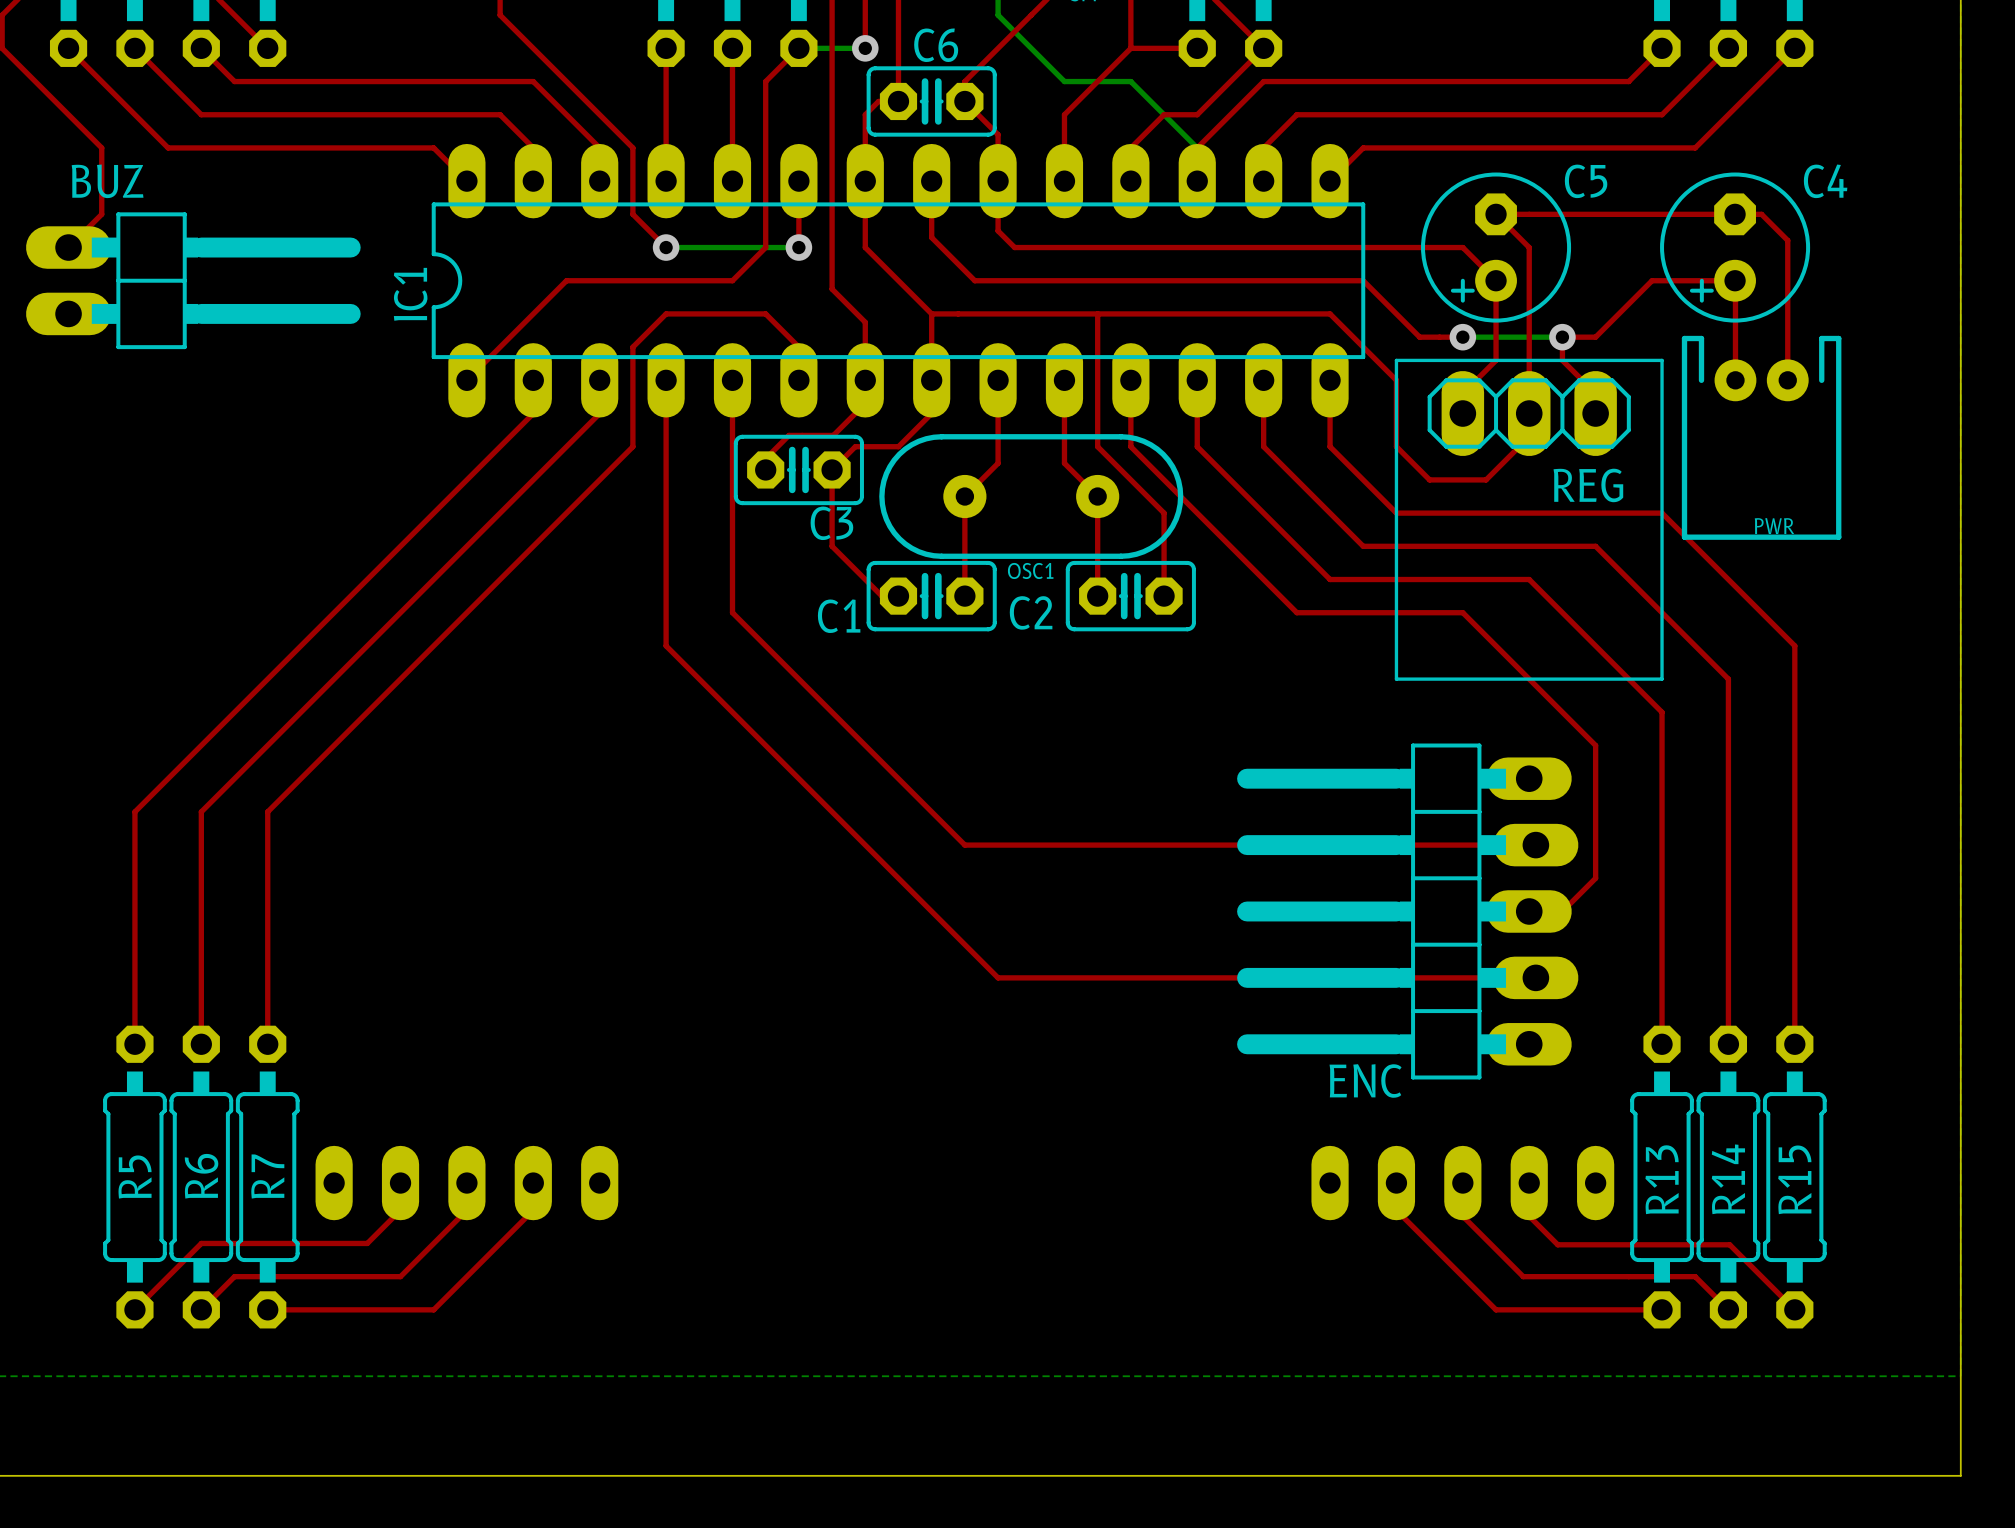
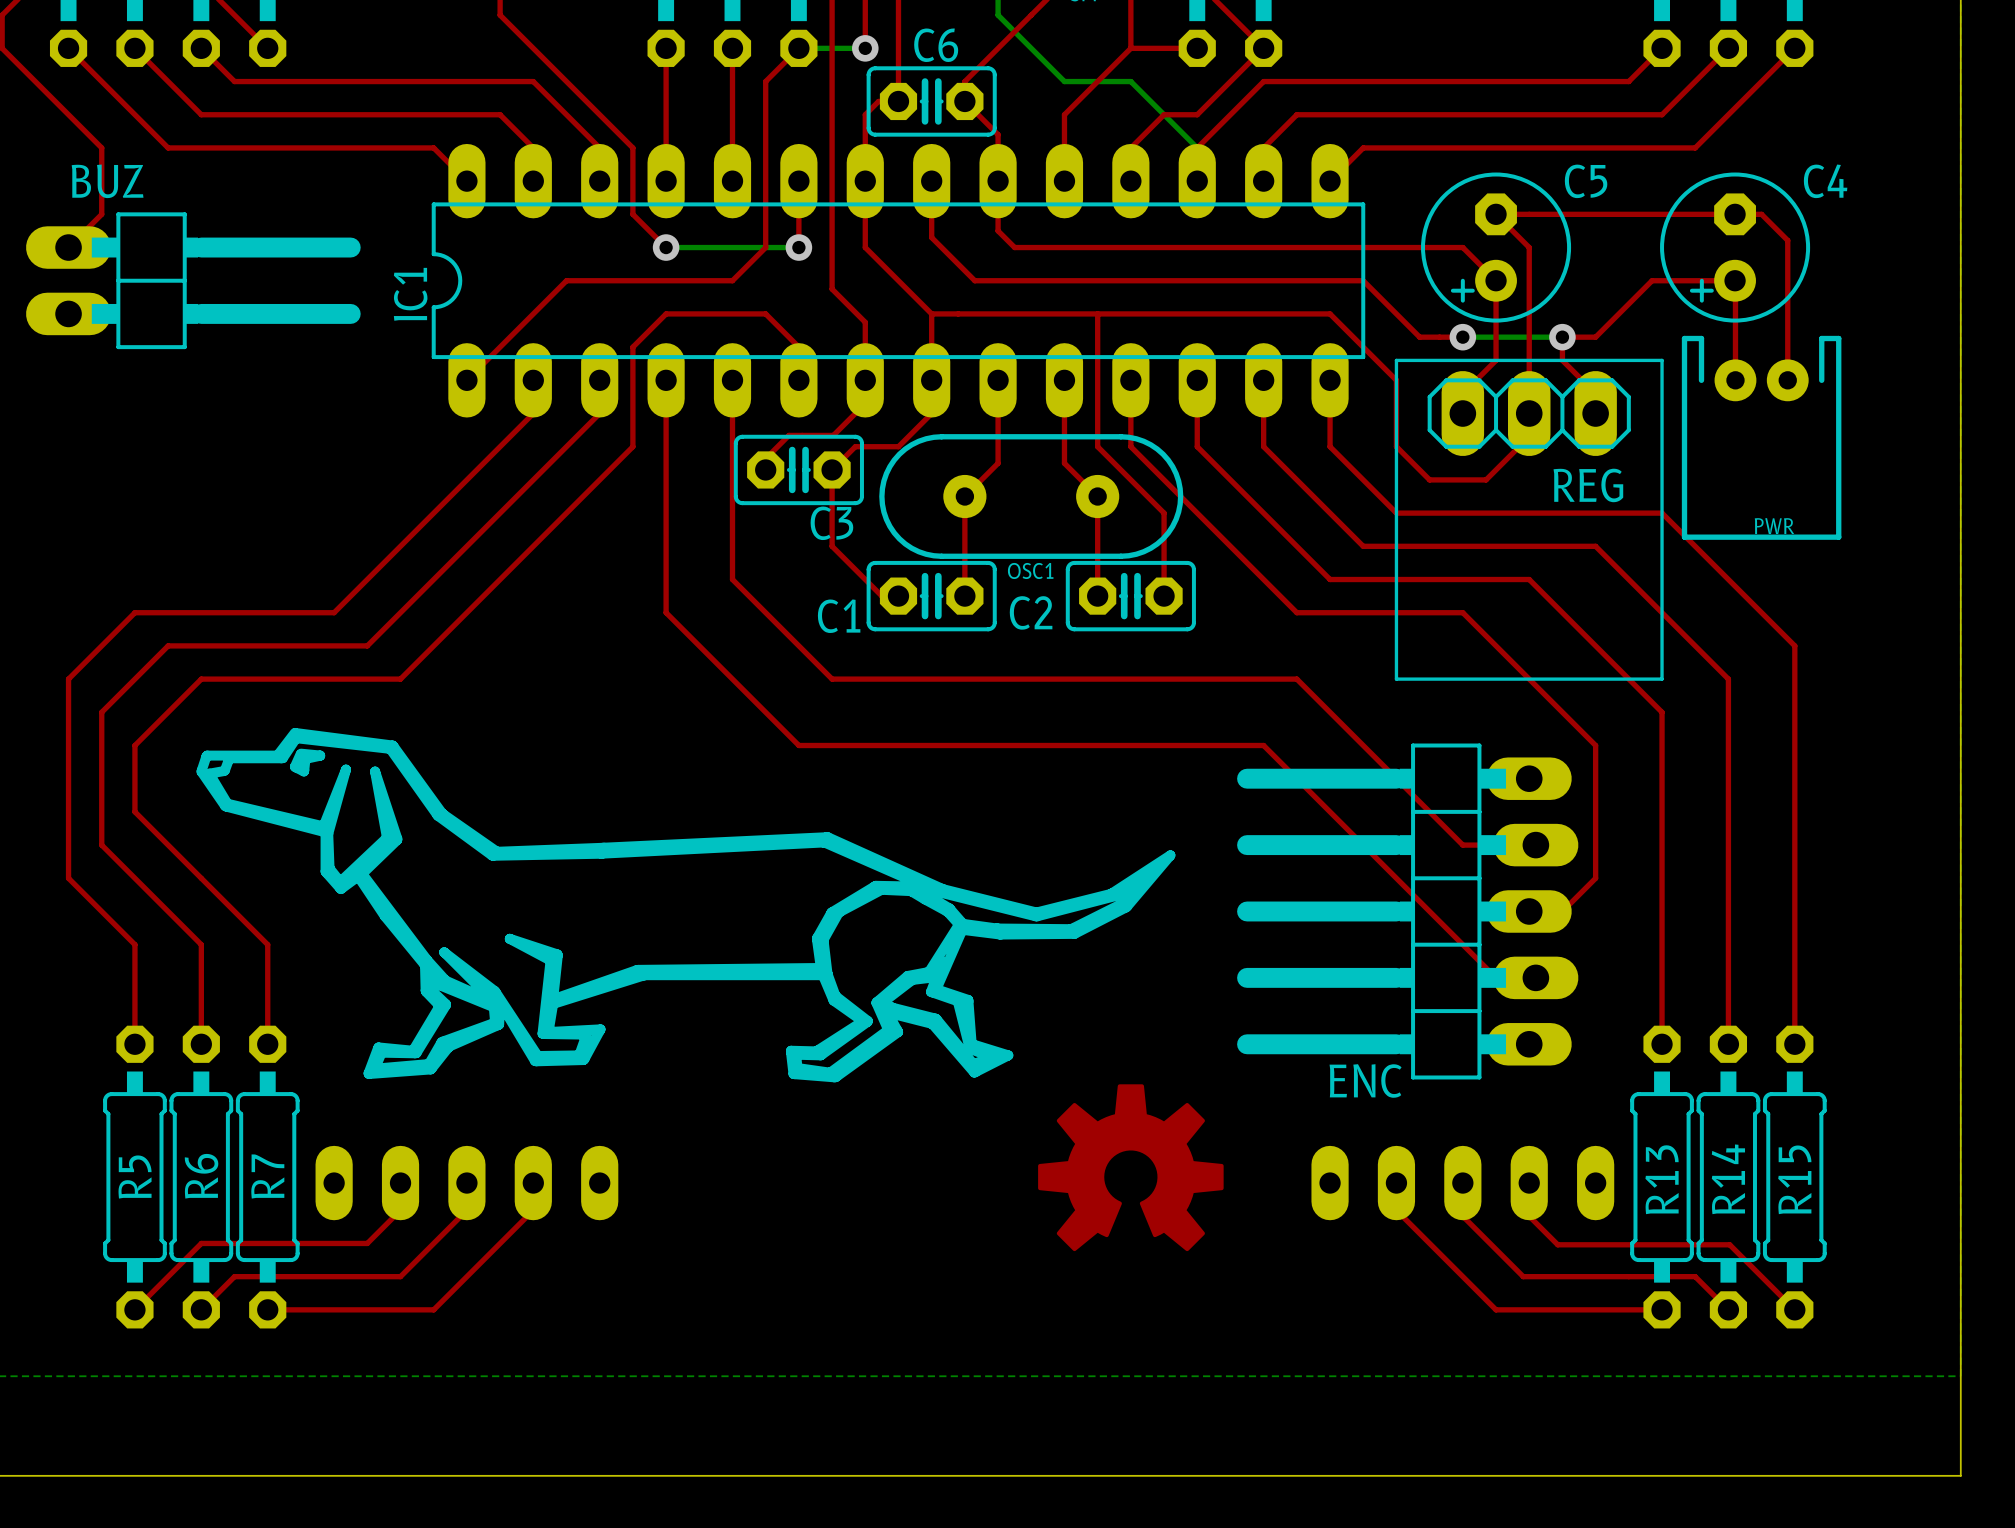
top track: (732, 579) (732, 612) (964, 845) (1462, 845) -> (732, 579) (832, 679) (1296, 679) (1462, 845)
top track: (334, 612) (134, 811) (134, 944) -> (334, 612) (134, 612) (68, 679) (68, 878) (134, 944)
top track: (666, 612) (666, 645) (998, 977) (1496, 977) -> (666, 612) (798, 745) (1263, 745) (1496, 977)
top track: (367, 645) (201, 811) (201, 944) -> (367, 645) (168, 645) (101, 712) (101, 845) (201, 944)
top track: (400, 679) (267, 811) (267, 944) -> (400, 679) (201, 679) (134, 745) (134, 811) (267, 944)
drawing: none -> [196, 727, 1224, 1252]

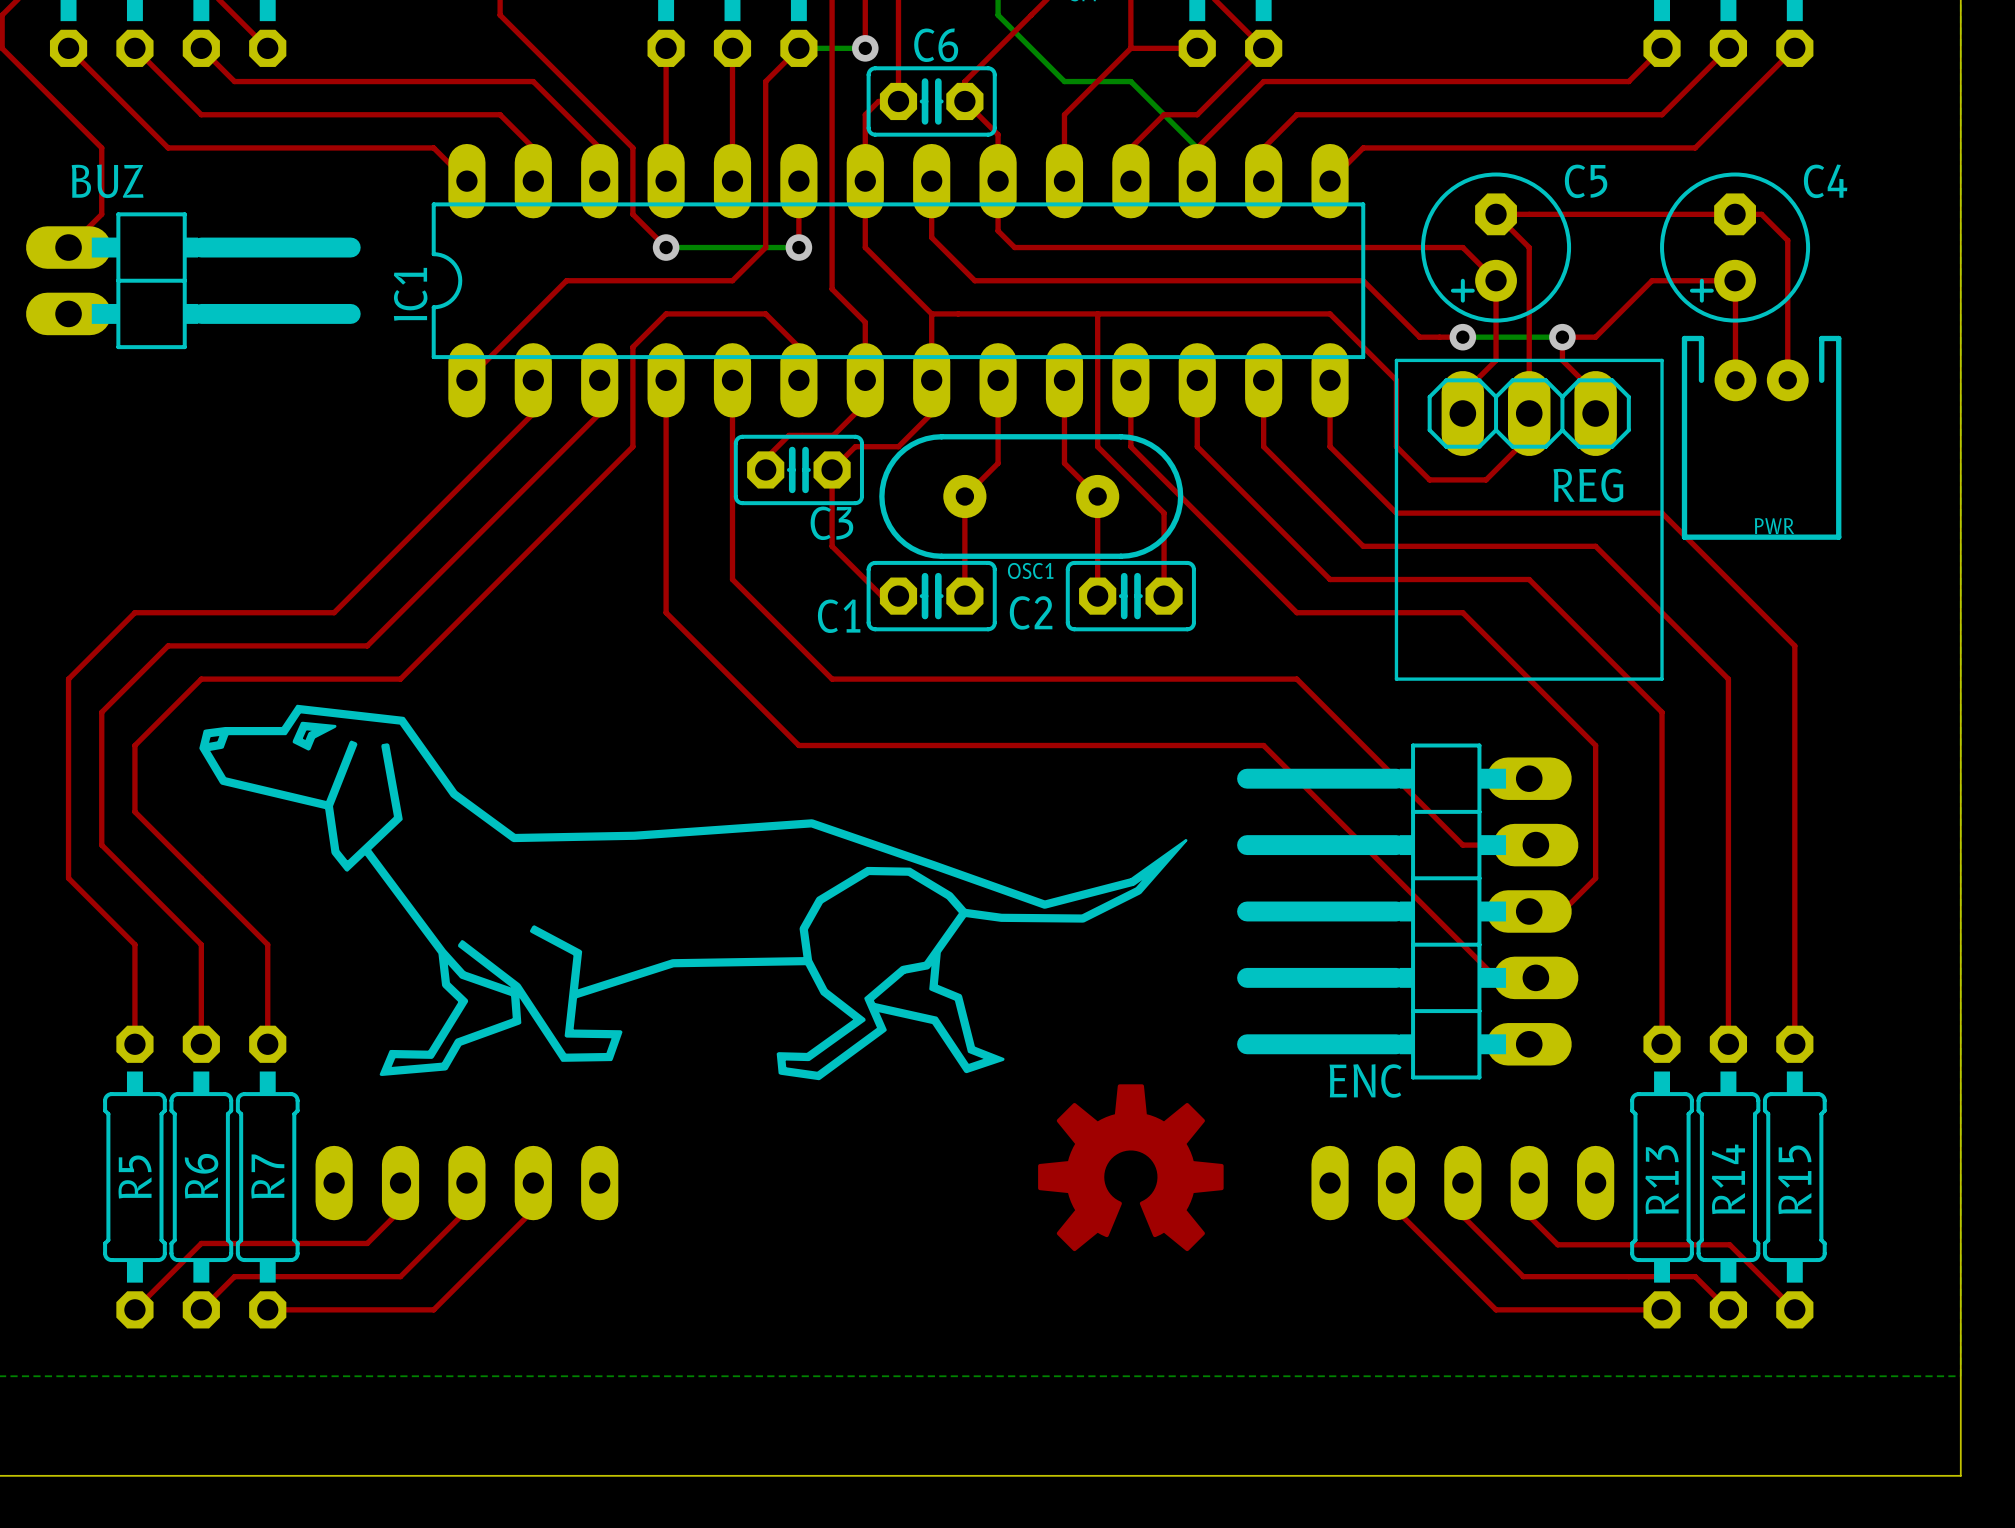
drawing shape: [196, 727, 1176, 1083] -> [199, 704, 1188, 1081]

